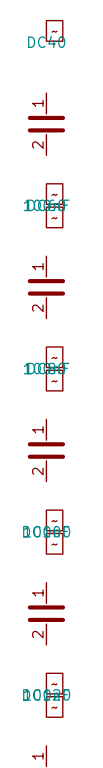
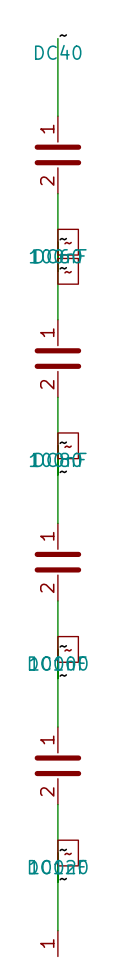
label: none -> ~ (63, 35)
wire: none -> (57, 38) (57, 116)
global label: ~ (54, 31) -> none
wire: none -> (57, 193) (57, 319)
label: none -> ~ (63, 239)
label: none -> ~ (63, 268)
wire: none -> (57, 397) (57, 523)
label: none -> ~ (63, 442)
label: none -> ~ (63, 471)
global label: ~ (54, 381) -> none
wire: none -> (57, 600) (57, 727)
label: none -> ~ (63, 646)
label: none -> ~ (63, 675)
global label: ~ (54, 544) -> none
wire: none -> (57, 804) (57, 930)
label: none -> ~ (63, 849)
label: none -> ~ (63, 879)
global label: ~ (54, 707) -> none

